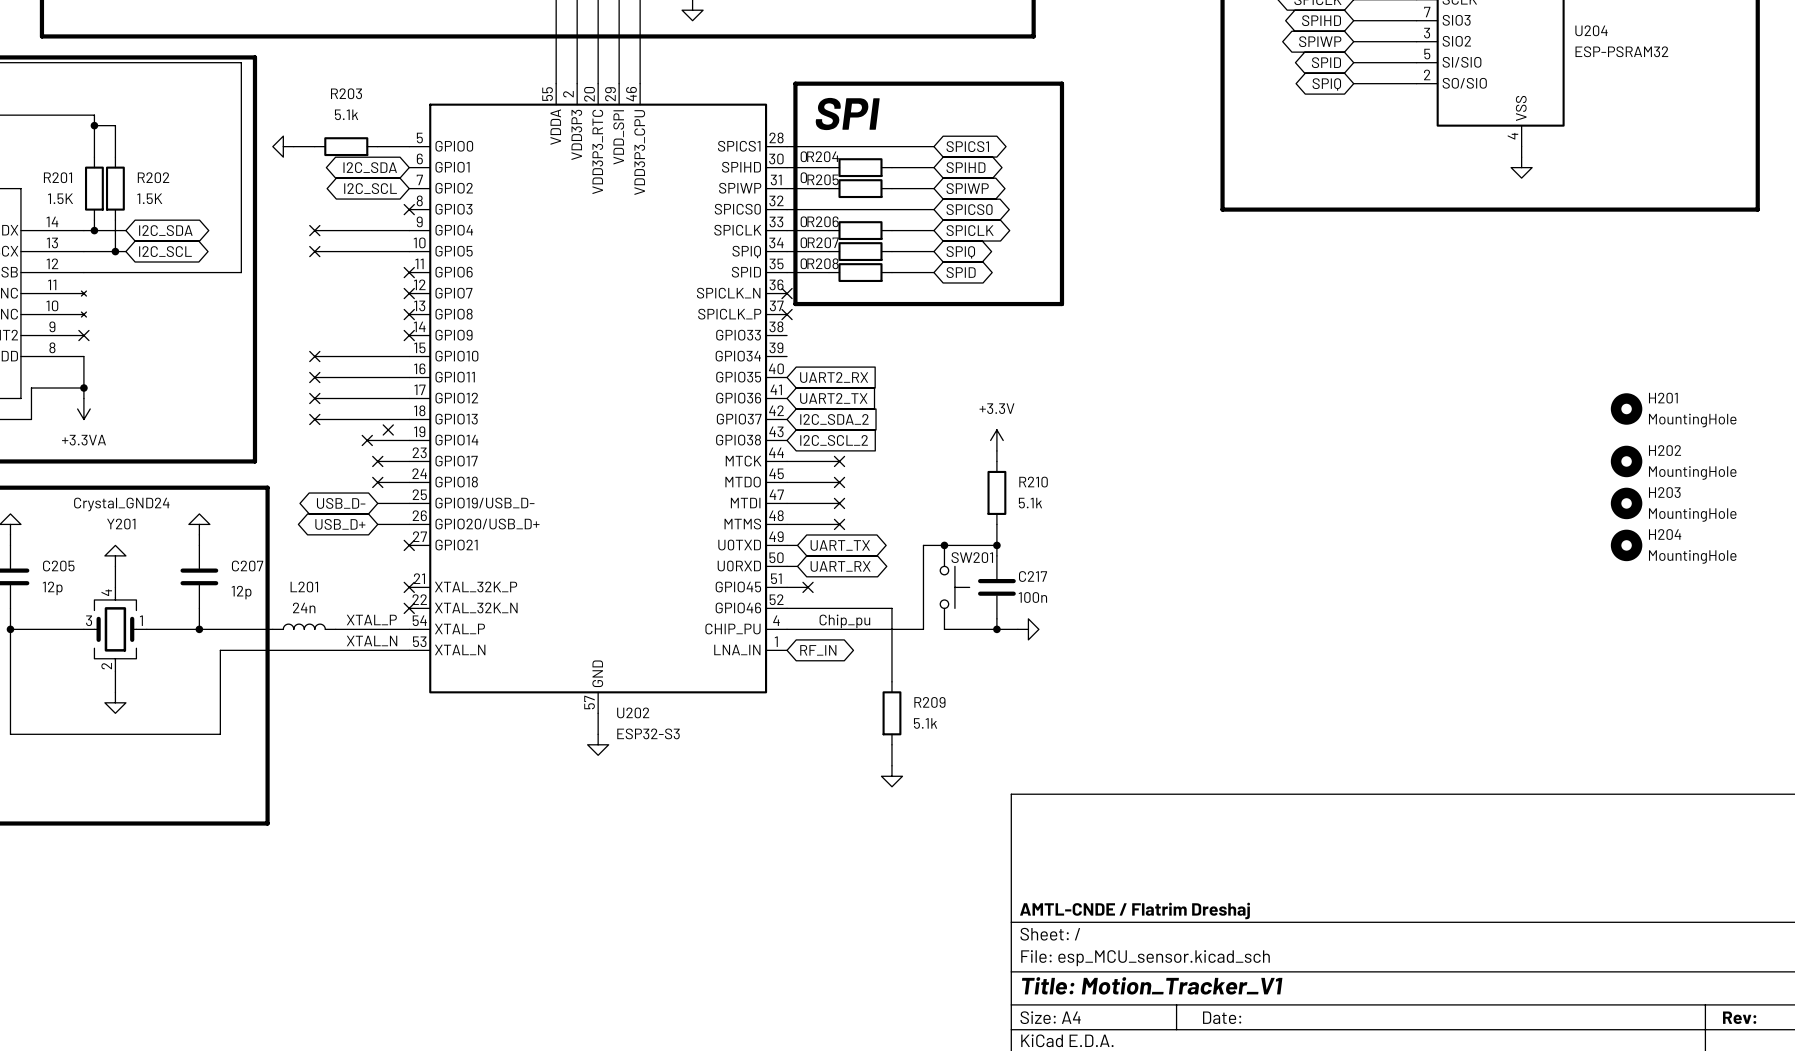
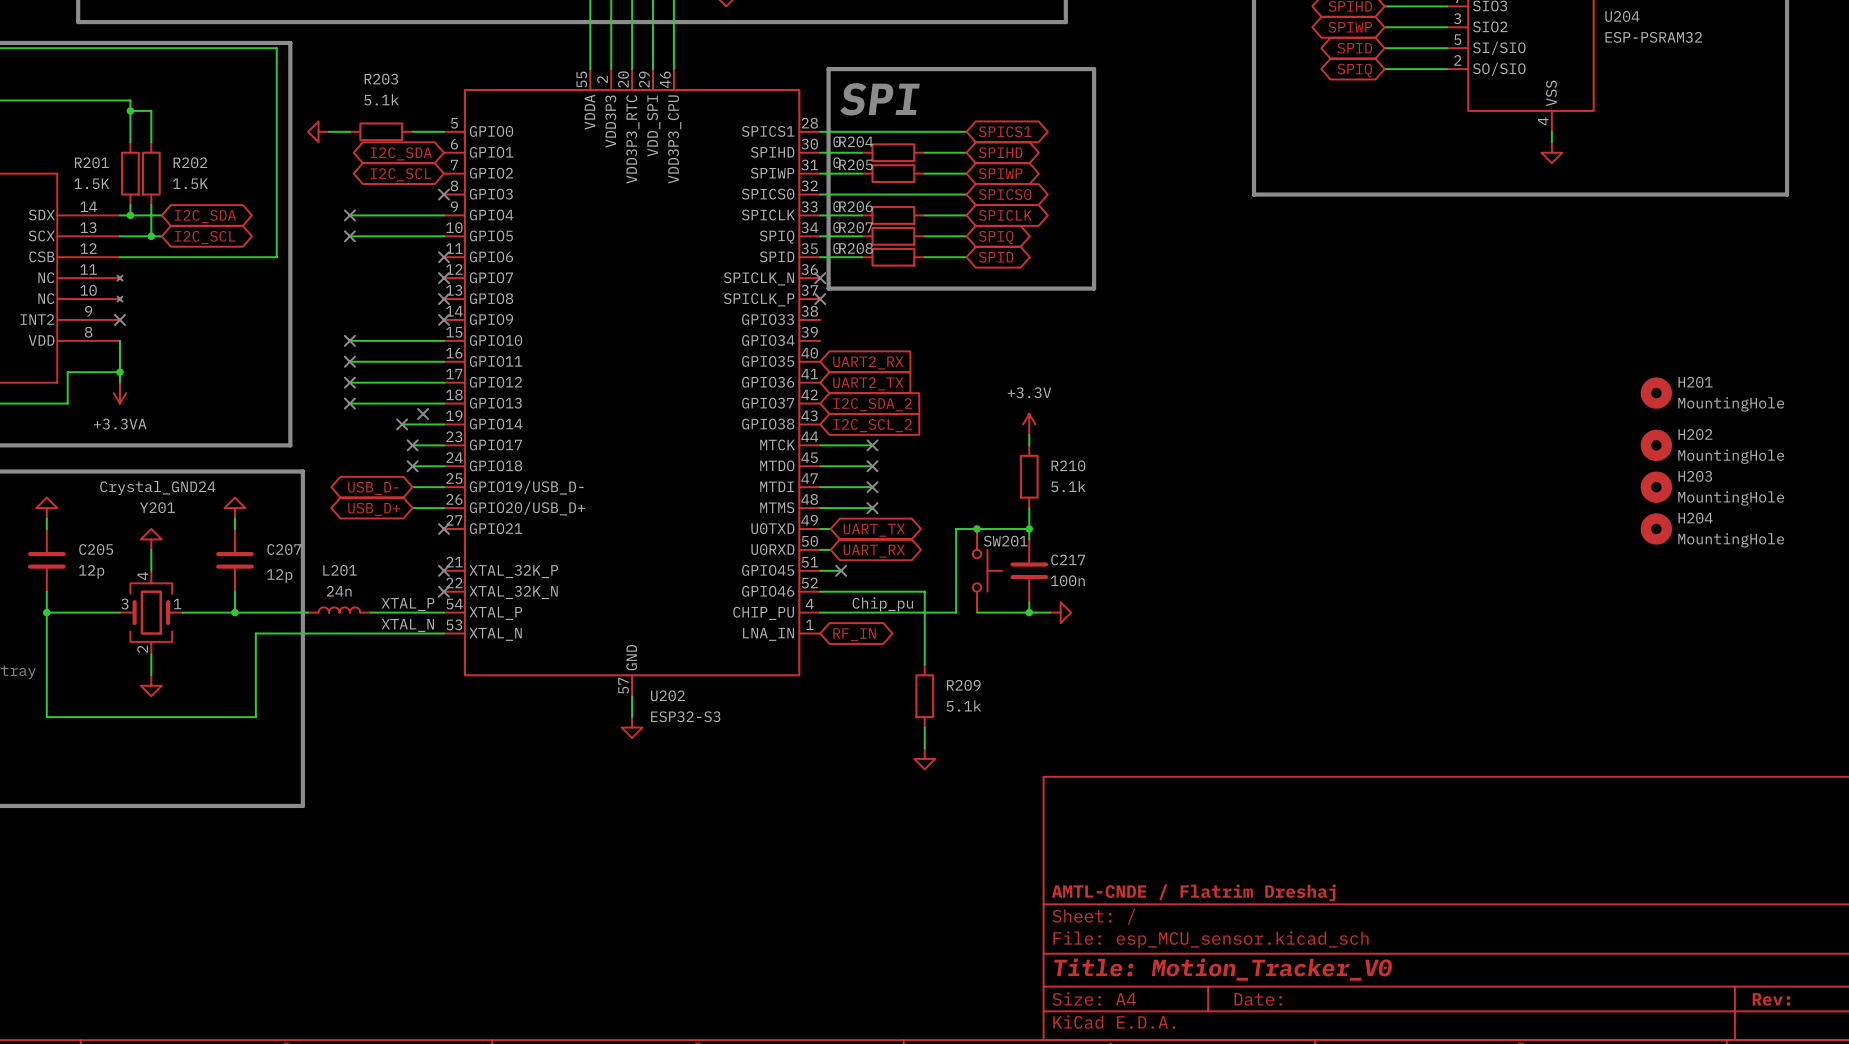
title block: Title: Motion_Tracker_V1 (1152, 985) -> Title: Motion_Tracker_V0 (1223, 969)

